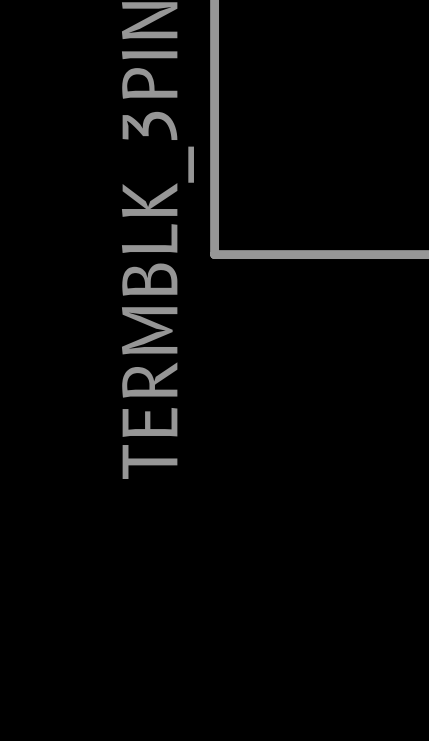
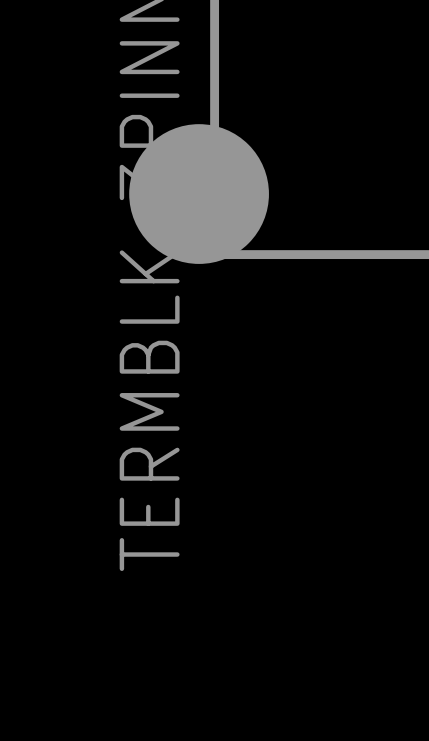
drawing: none -> [129, 124, 269, 264]

